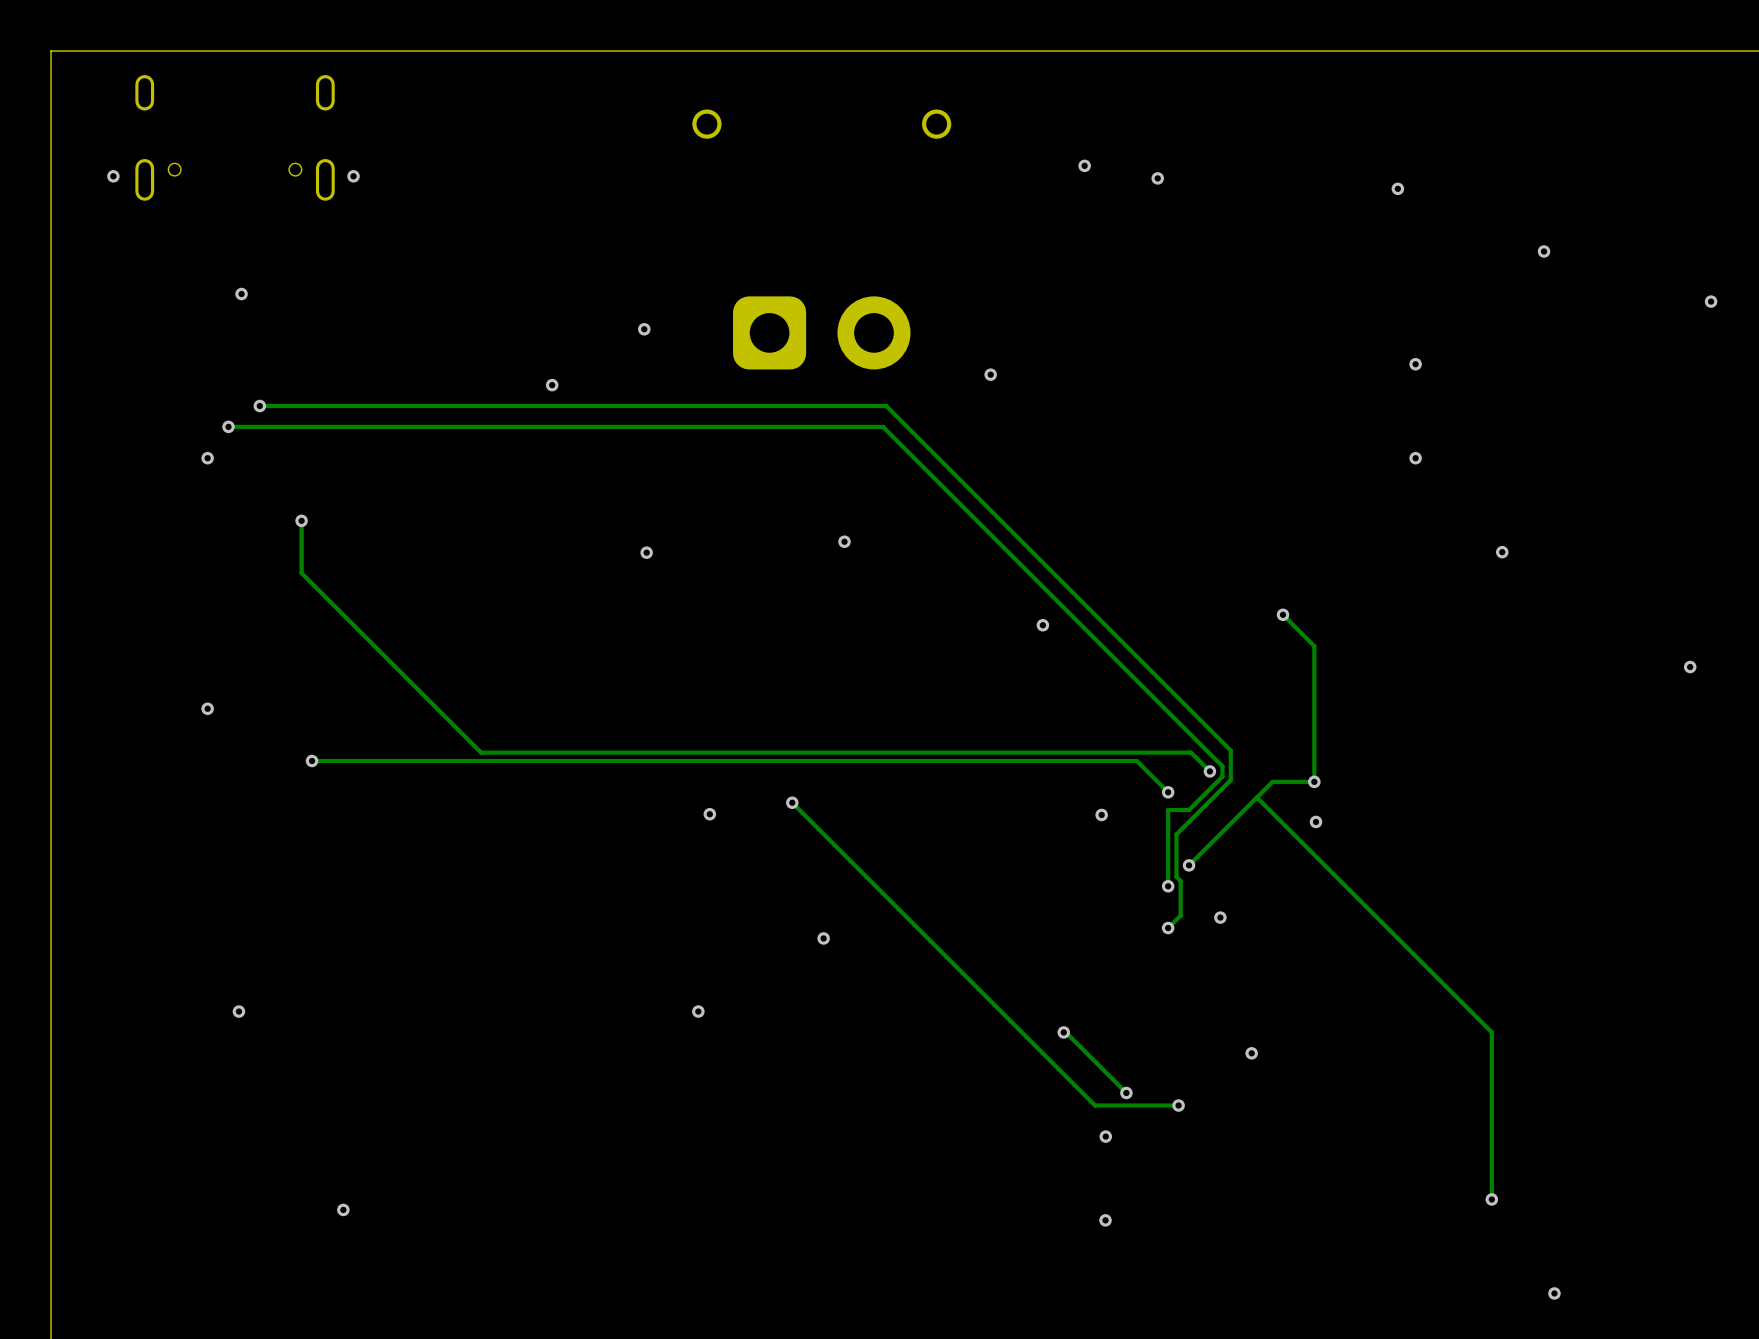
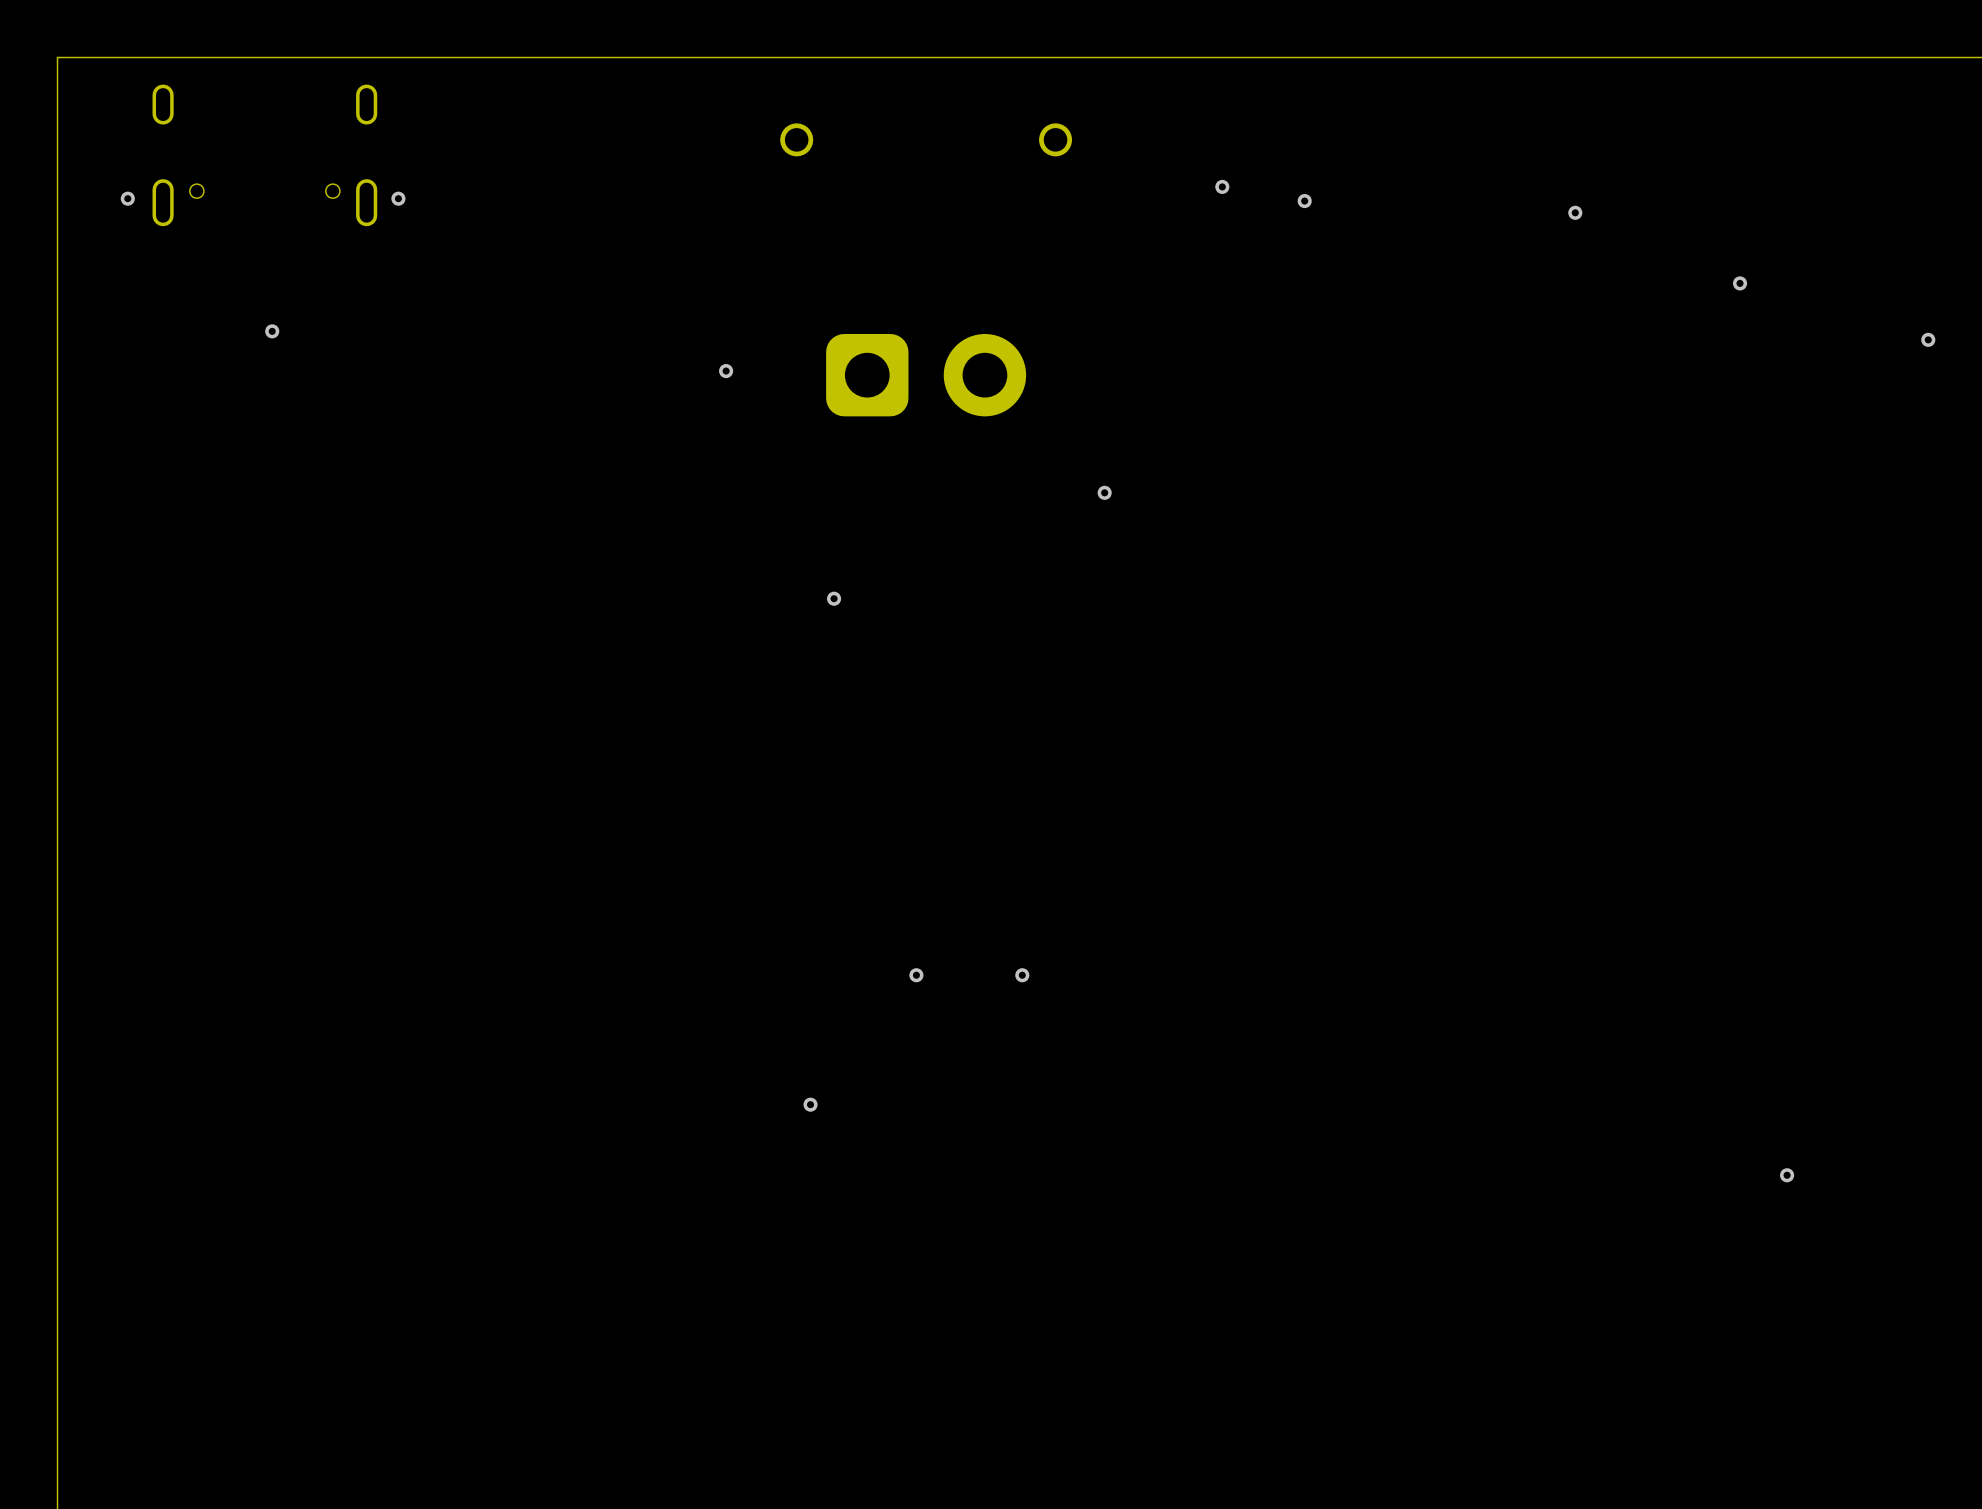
via: (1415, 364) -> none
via position: (990, 374) -> (1104, 492)
via: (552, 385) -> none
track: (259, 406) (886, 406) (1230, 750) (1230, 780) (1176, 834) (1176, 876) (1180, 881) (1180, 915) (1168, 928) -> none
via: (259, 406) -> none
track: (228, 426) (883, 426) (1222, 766) (1222, 776) (1189, 810) (1168, 810) (1168, 886) -> none
via: (228, 426) -> none
via: (207, 458) -> none
via: (1415, 458) -> none
track: (301, 520) (301, 573) (481, 752) (1191, 752) (1209, 771) -> none
via: (301, 520) -> none
via: none -> (834, 598)
via: (844, 541) -> none
via: (646, 552) -> none
via: (1502, 552) -> none
track: (1283, 614) (1314, 646) (1314, 781) (1272, 781) (1189, 865) -> none
via: (1283, 614) -> none
via: (1042, 625) -> none
via: (1690, 667) -> none
via: (207, 708) -> none
track: (312, 760) (1136, 760) (1168, 792) -> none
via: (312, 760) -> none
via: (1209, 771) -> none
via: (1314, 781) -> none
via: (1168, 792) -> none
track: (1256, 797) (1491, 1032) (1491, 1199) -> none
track: (792, 802) (1095, 1105) (1178, 1105) -> none
via: (792, 802) -> none
via: (709, 814) -> none
via: (1101, 814) -> none
via: (1316, 821) -> none
via: none -> (916, 975)
via: none -> (1022, 975)
via: (1189, 865) -> none
via: (1168, 886) -> none
via: (1220, 917) -> none
via: (1168, 928) -> none
via: (823, 938) -> none
via: (238, 1011) -> none
via position: (698, 1011) -> (810, 1104)
track: (1063, 1032) (1126, 1092) -> none
via: (1063, 1032) -> none
via: none -> (1787, 1175)
via: (1251, 1053) -> none
via: (1126, 1092) -> none
via: (1178, 1105) -> none
via: (1105, 1136) -> none
via: (1491, 1199) -> none
via: (343, 1209) -> none
via: (1105, 1220) -> none
via: (1554, 1293) -> none

